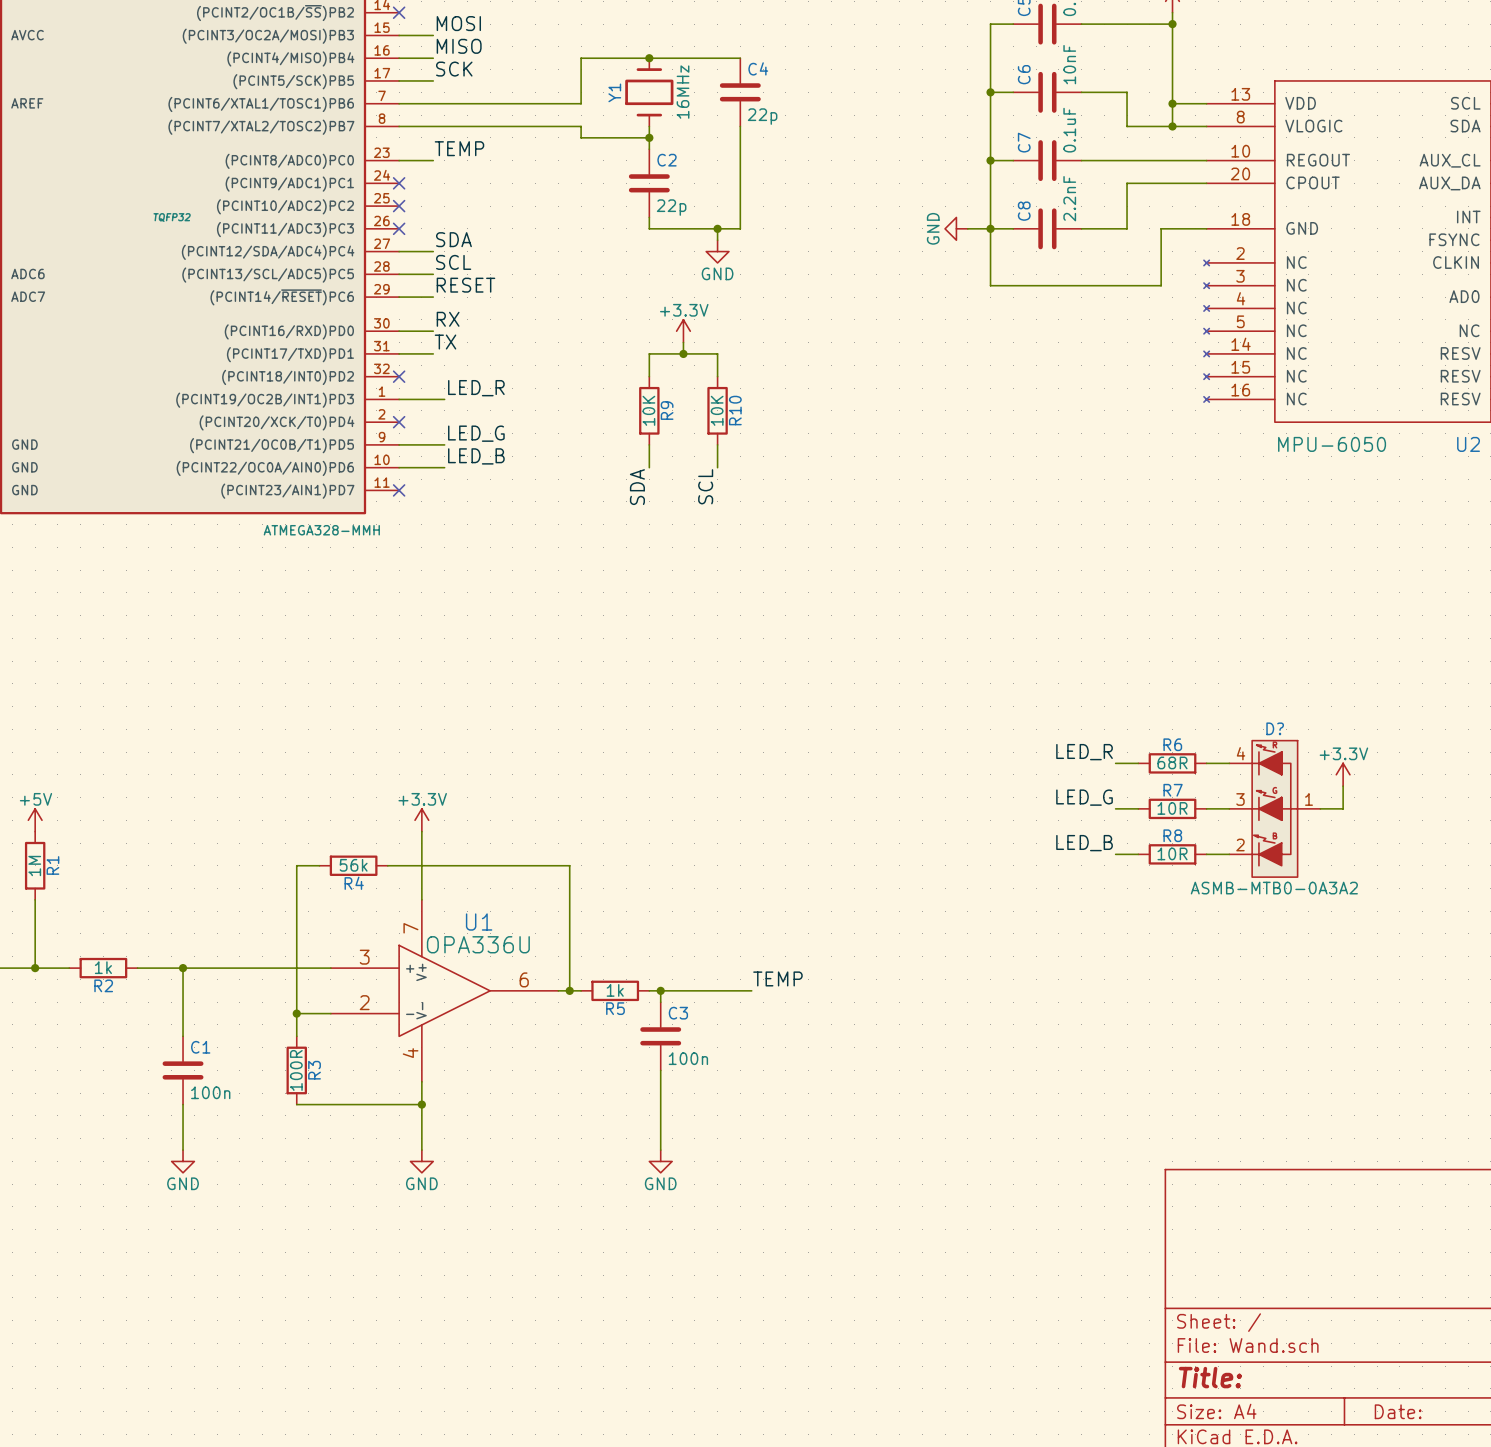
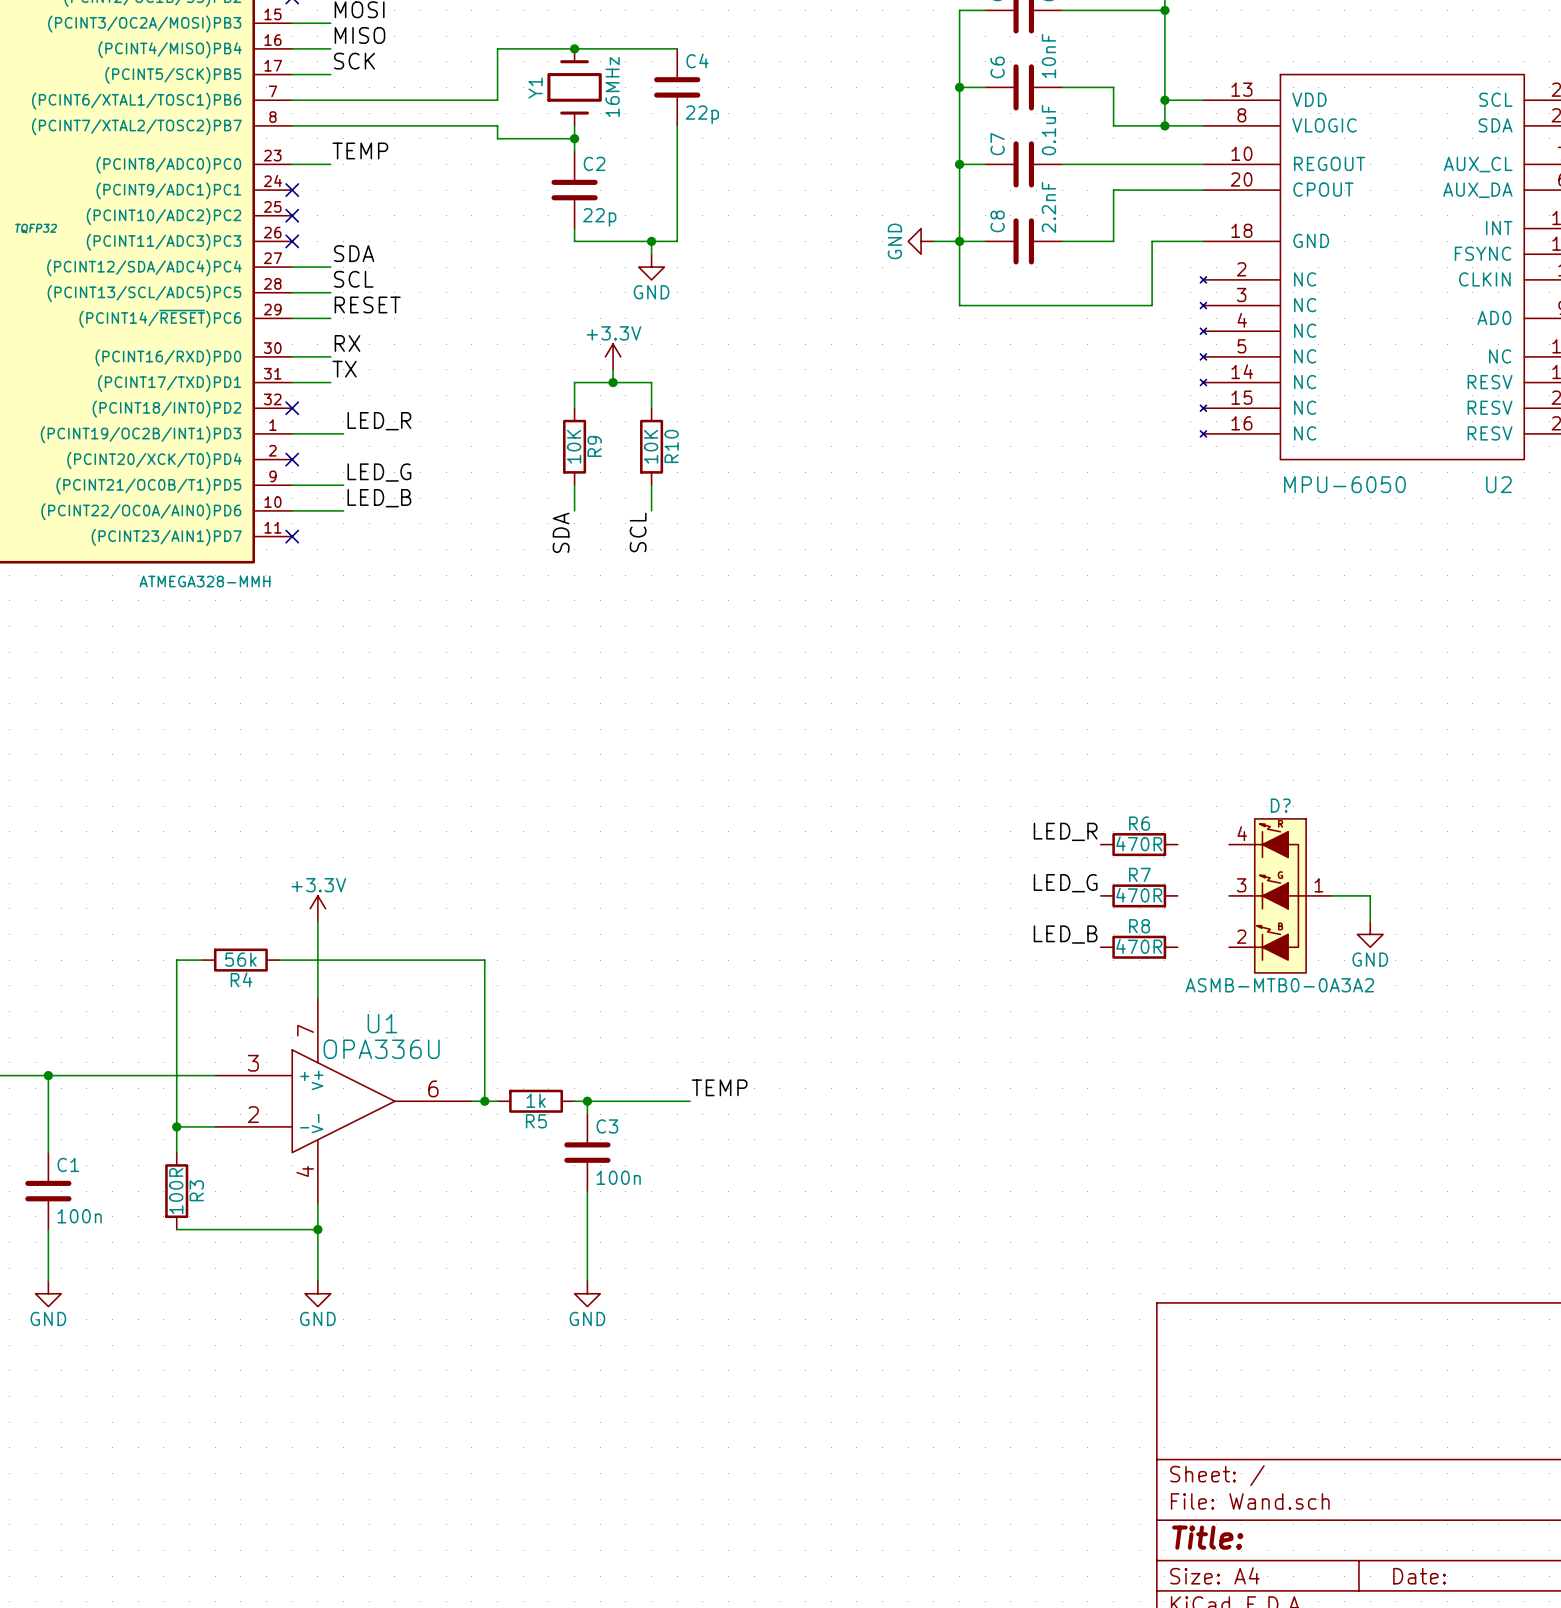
R6 value: 68R (1172, 762) -> 470R (1139, 843)
R6 position: (1172, 763) -> (1139, 844)
wire: (1206, 763) (1229, 763) -> none
power symbol: +3.3V (1343, 774) -> none
wire: (1343, 786) (1343, 808) -> (1370, 921) (1370, 895) (1357, 895)
R7 position: (1172, 808) -> (1139, 895)
R7 value: 10R (1172, 808) -> 470R (1139, 895)
wire: (1206, 808) (1229, 808) -> none
power symbol: none -> GND (1370, 934)
R8 value: 10R (1172, 853) -> 470R (1139, 946)
R8 position: (1172, 854) -> (1139, 947)
wire: (1206, 854) (1229, 854) -> none

